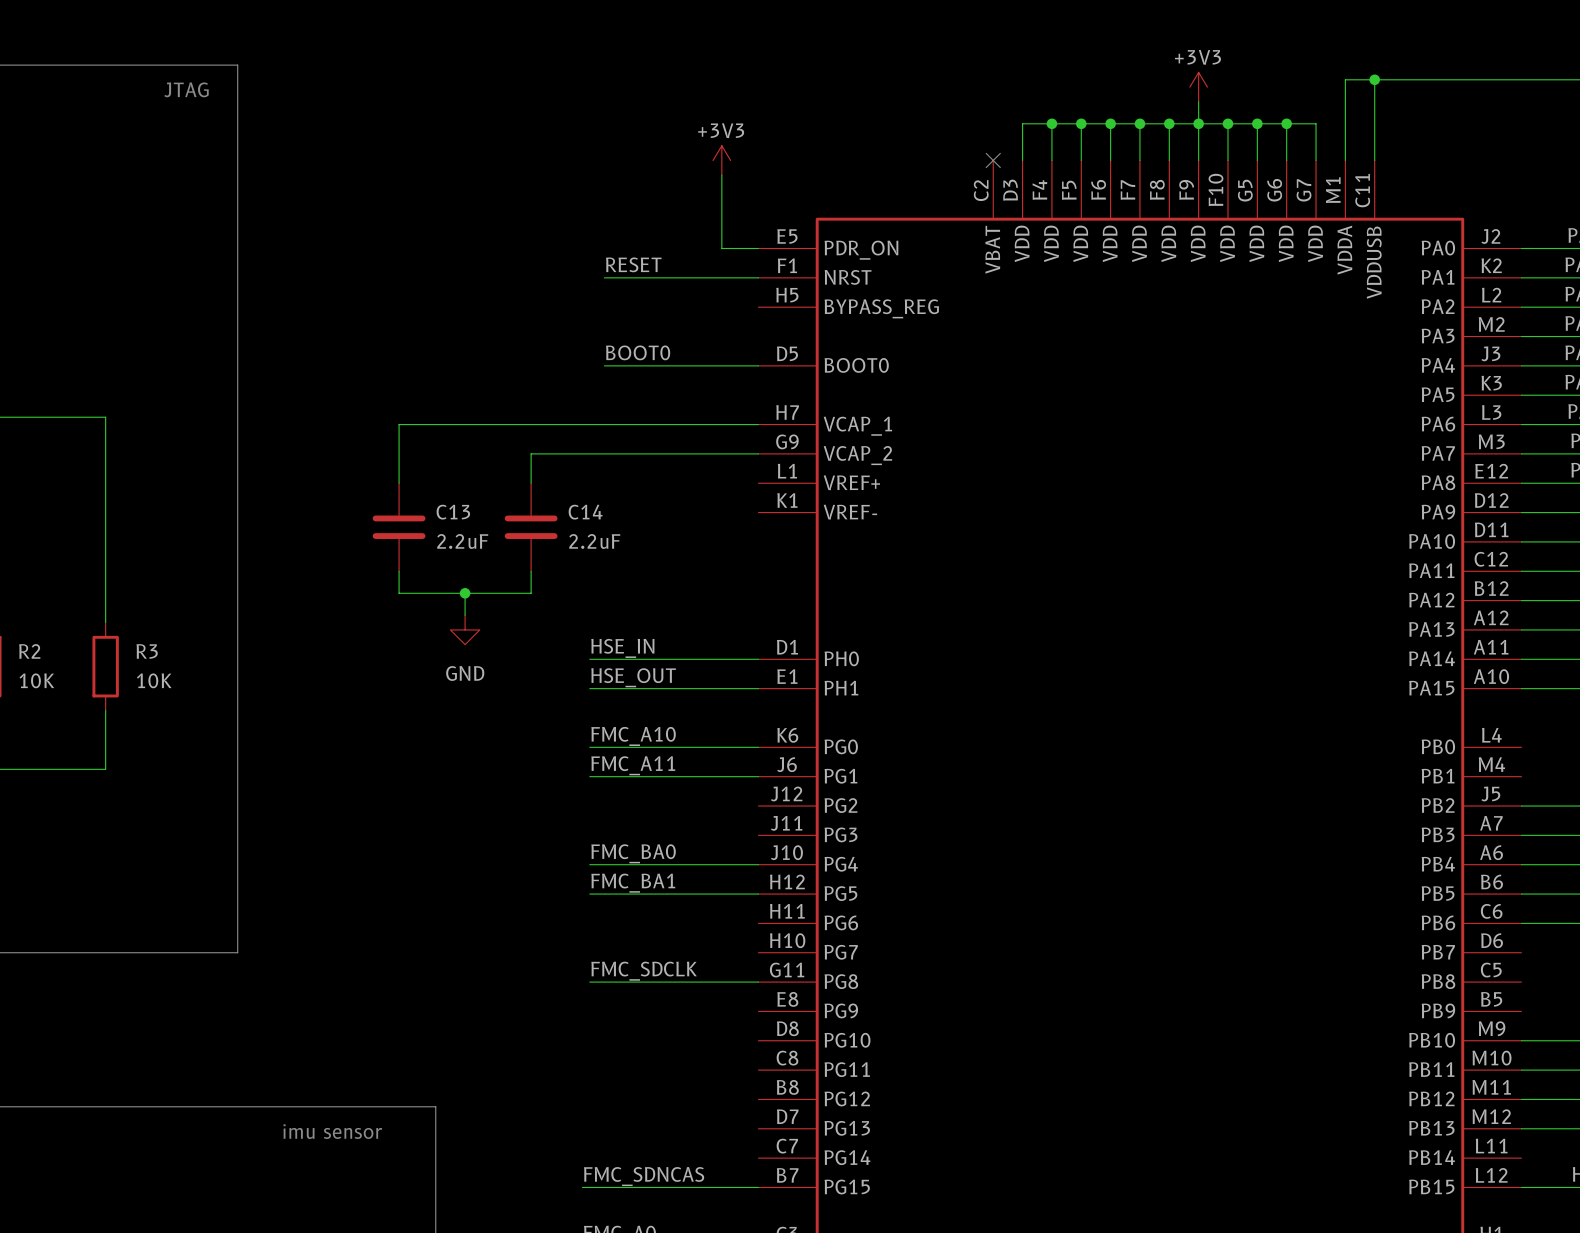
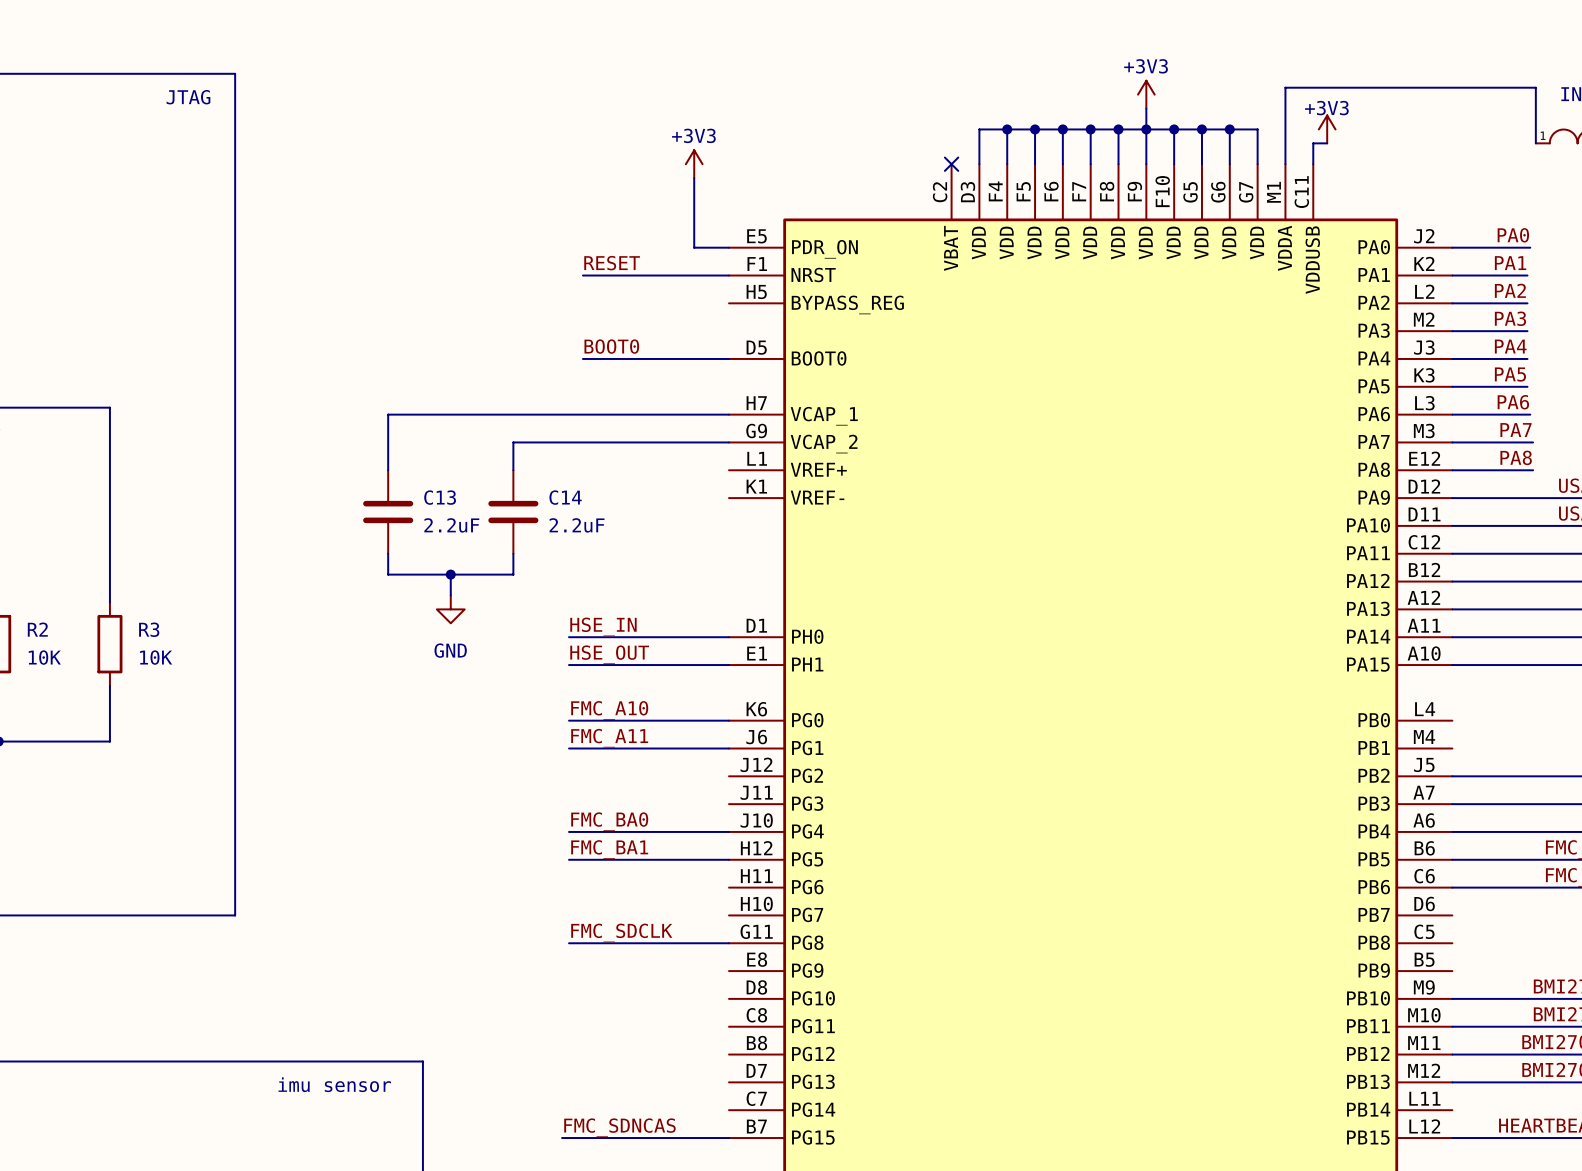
wire: (1374, 79) (1374, 138) -> (1327, 143) (1313, 143)
junction: (1374, 79) -> none
power symbol: none -> +3V3 (1327, 129)

